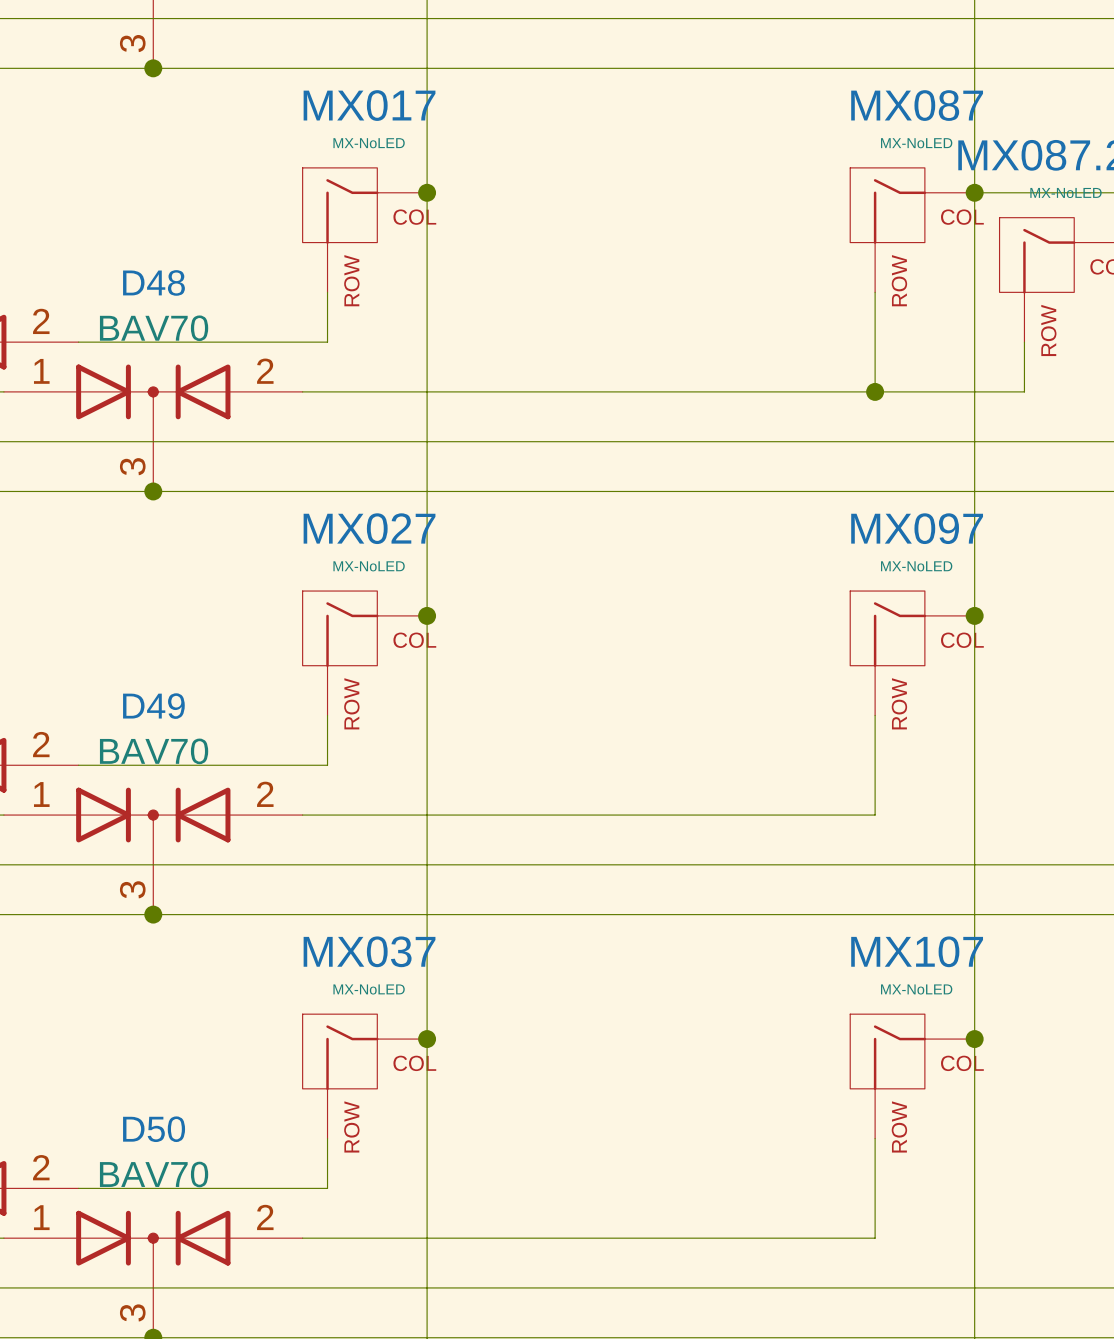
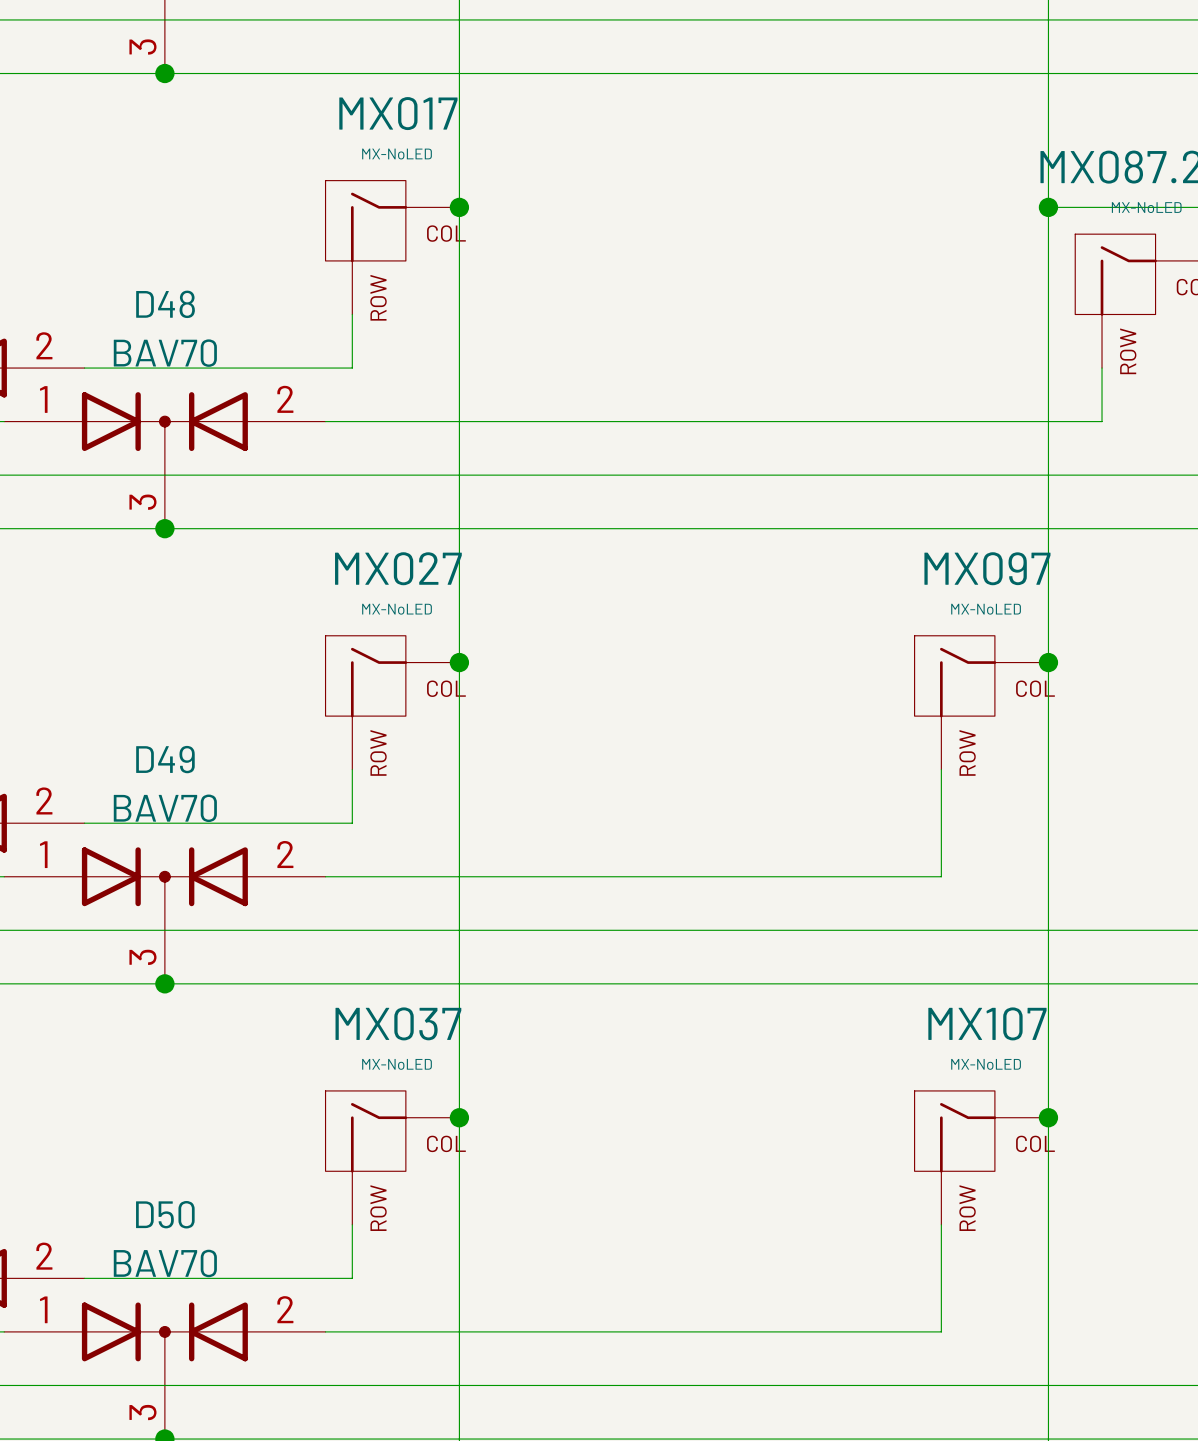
MX087: MX-NoLED (912, 230) -> none
wire: (875, 292) (875, 391) -> none
junction: (875, 391) -> none

